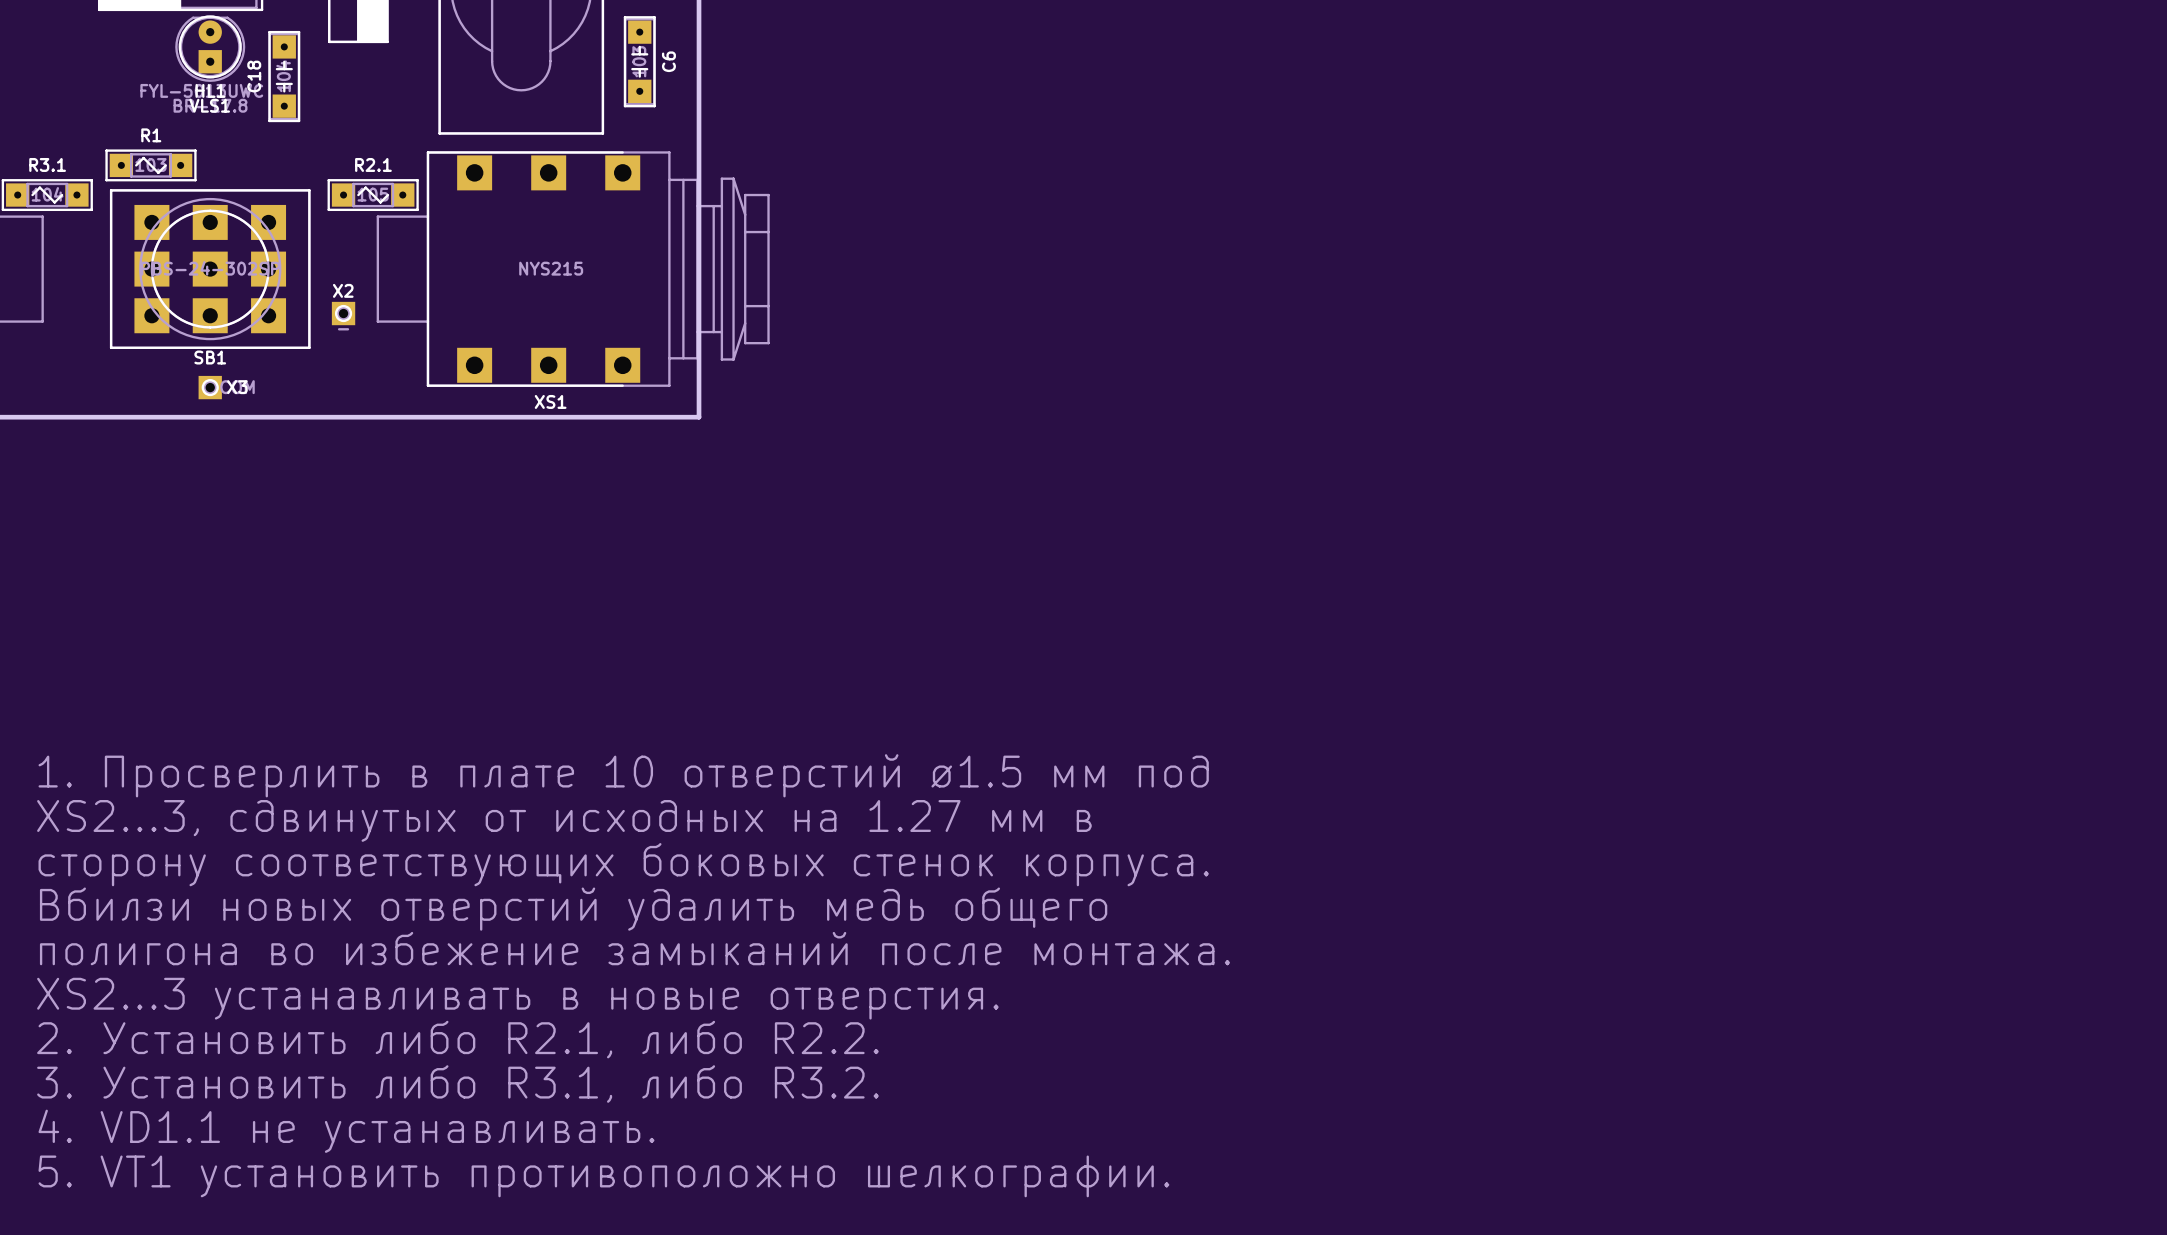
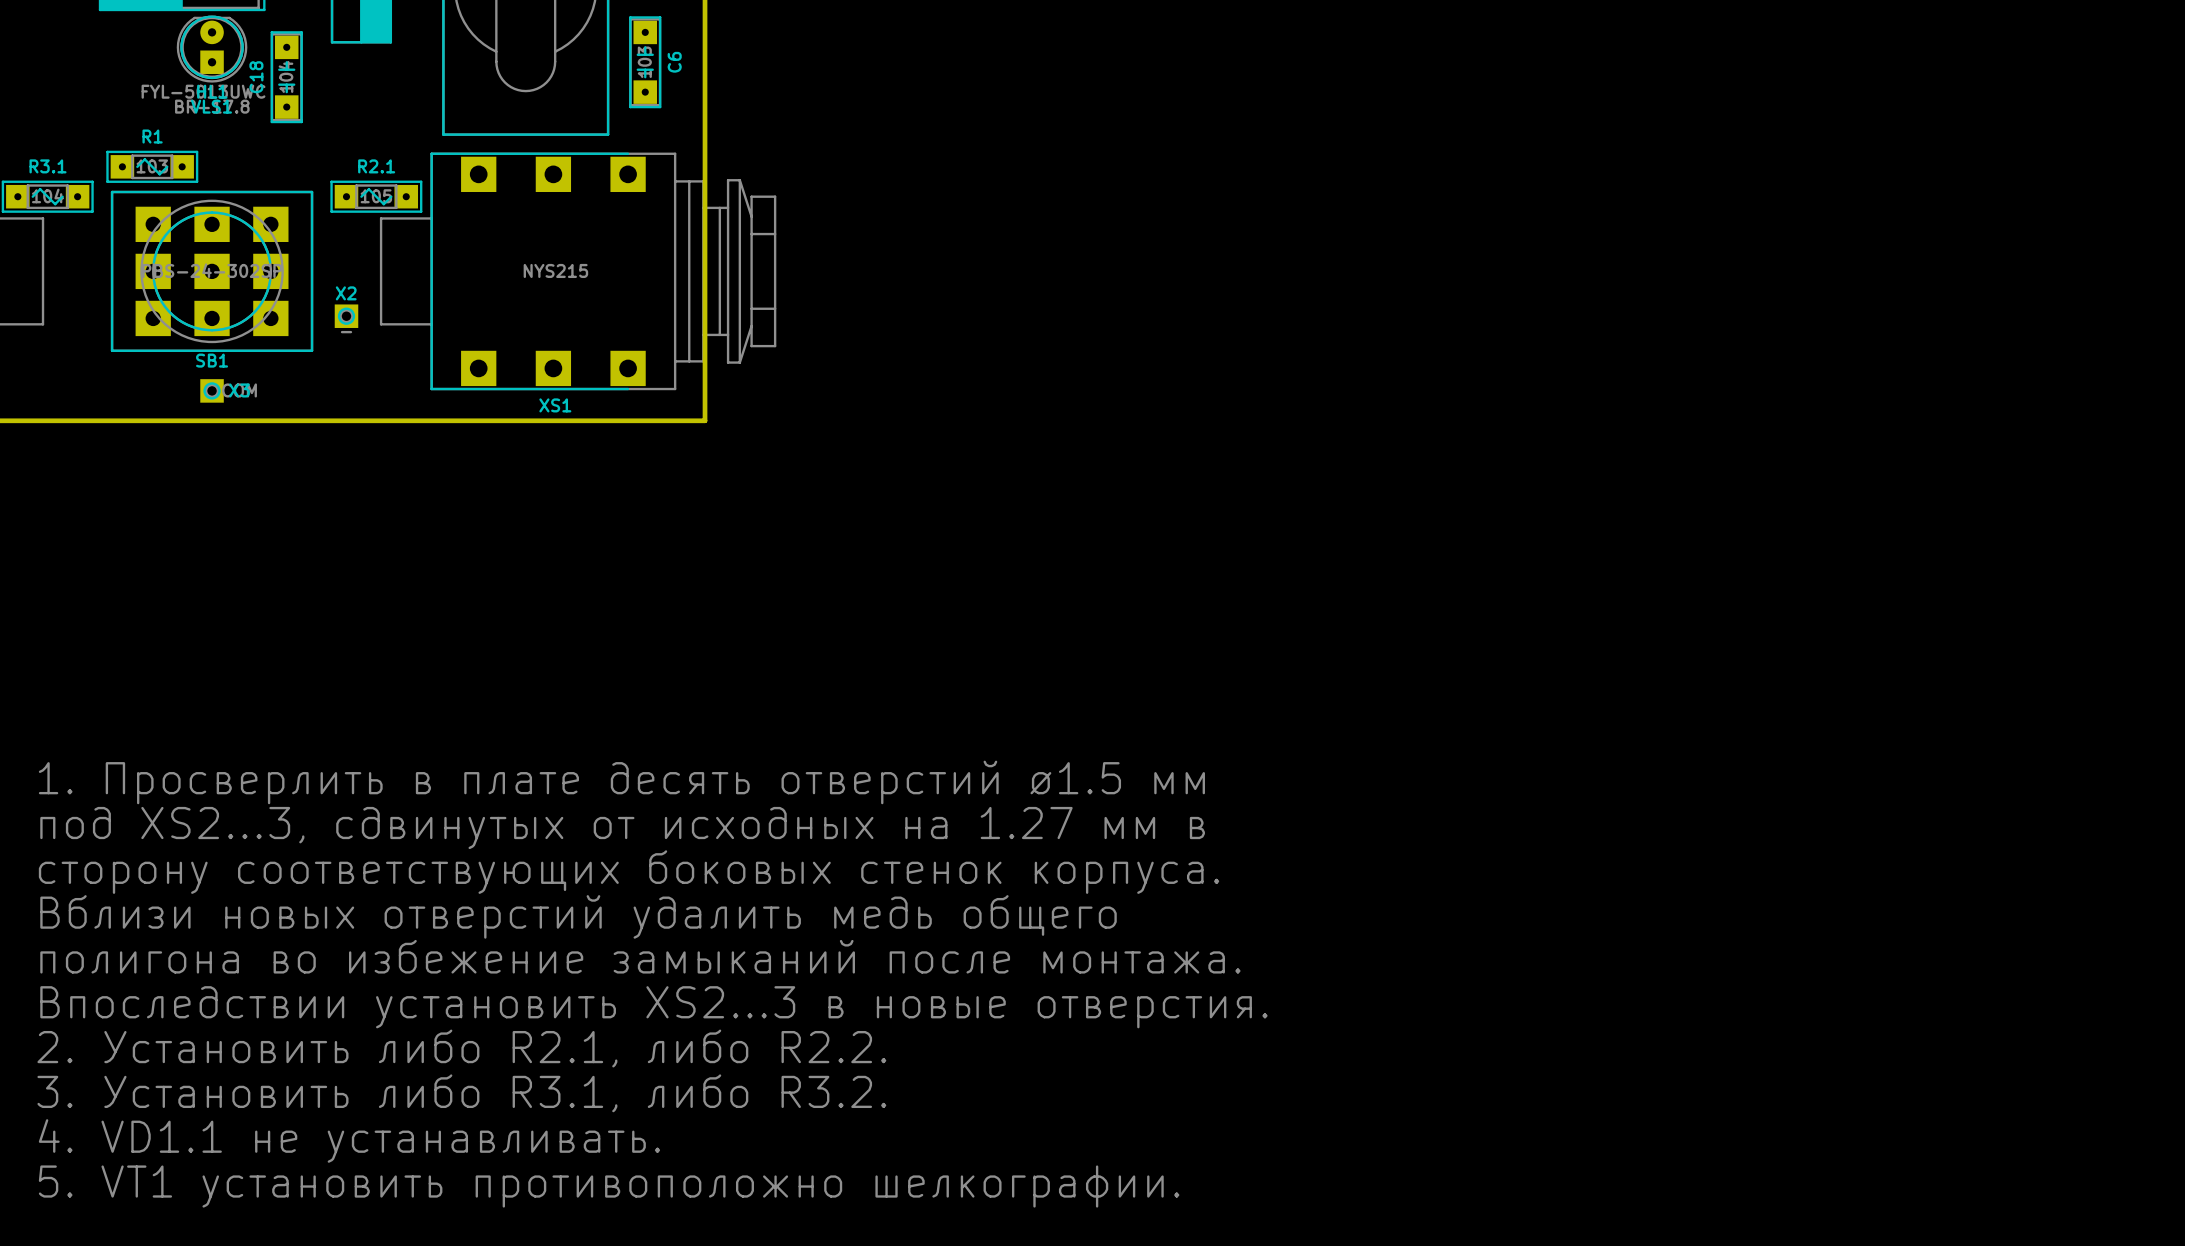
text: 1. Просверлить в плате 10 отверстий ø1.5 мм под (623, 775) -> 1. Просверлить в плате десять отверстий ø1.5 мм (621, 782)
text: XS2...3, сдвинутых от исходных на 1.27 мм в (564, 820) -> под XS2...3, сдвинутых от исходных на 1.27 мм в (622, 827)
text: Вбилзи новых отверстий удалить медь общего (573, 909) -> Вблизи новых отверстий удалить медь общего (578, 916)
text: XS2...3 устанавливать в новые отверстия. (517, 998) -> Впоследствии установить XS2...3 в новые отверстия. (653, 1007)

